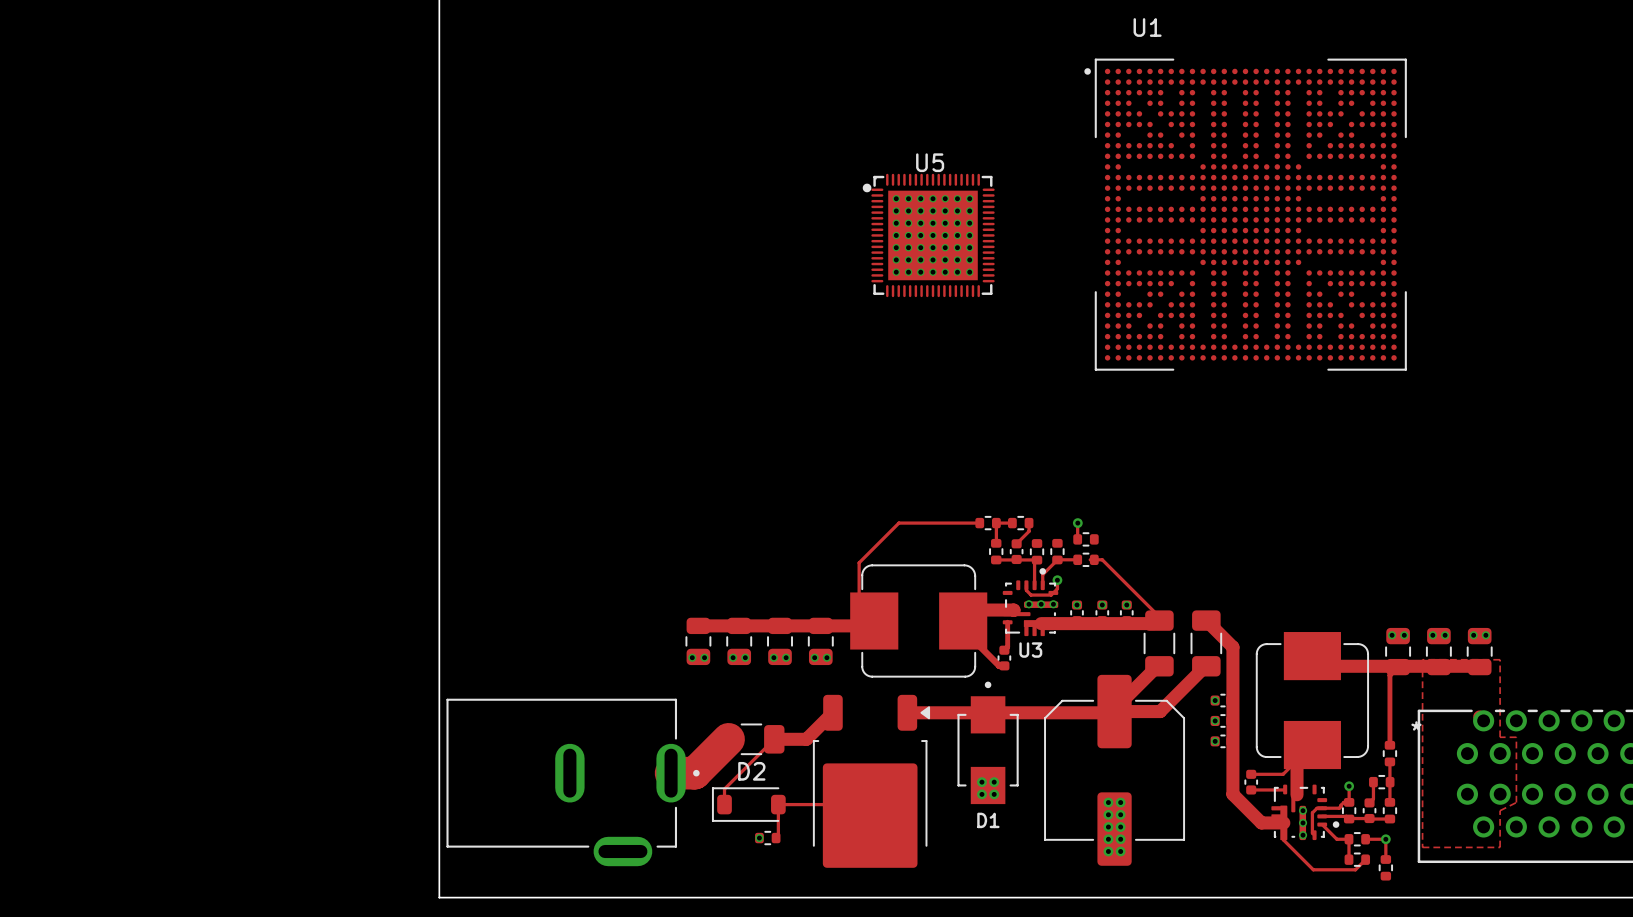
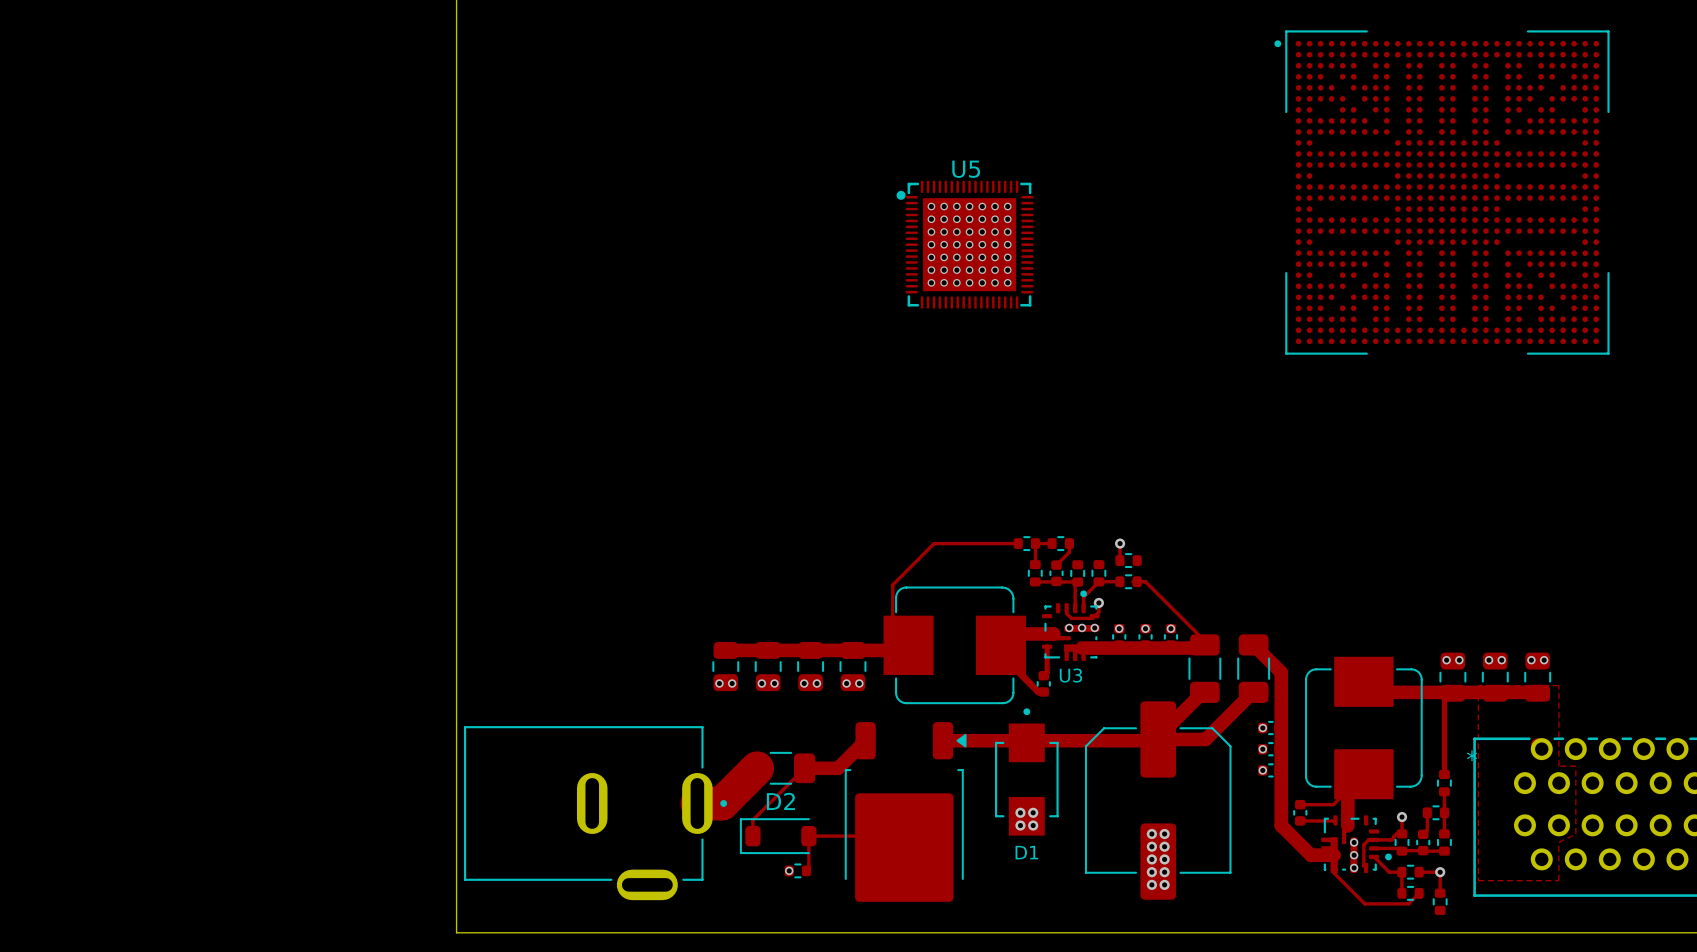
part: none -> (1441, 192)
U1: (1245, 214) -> none

